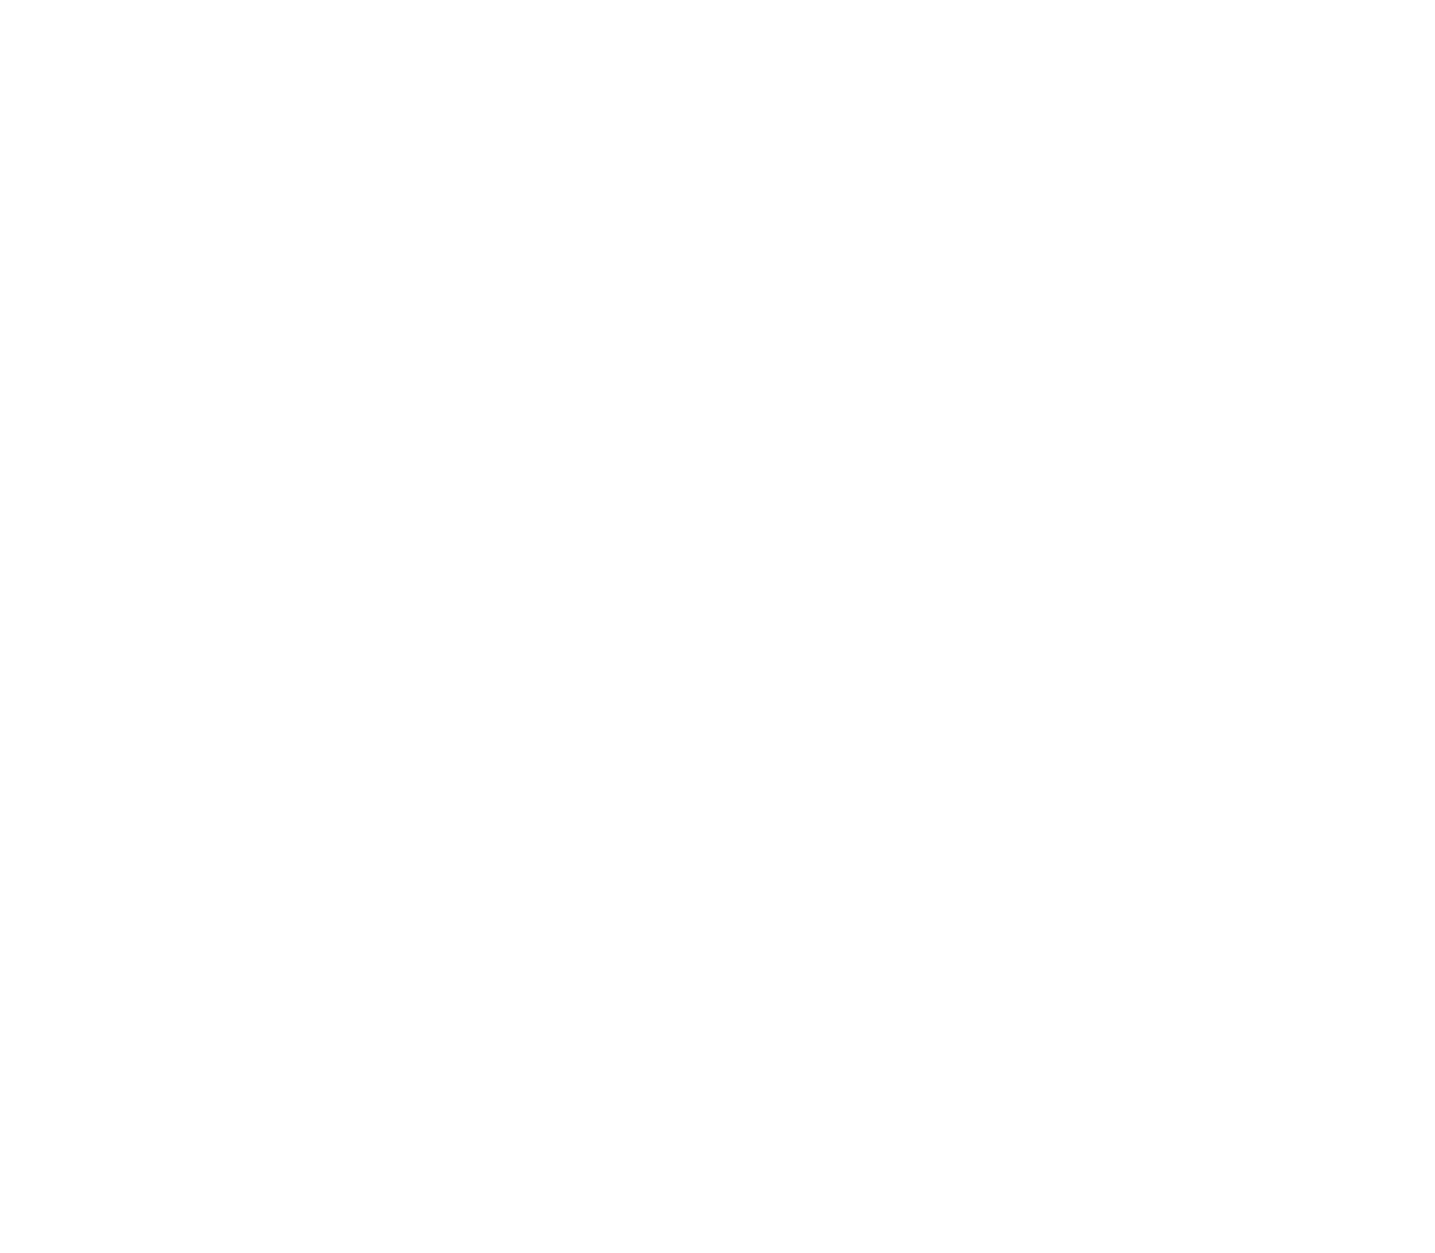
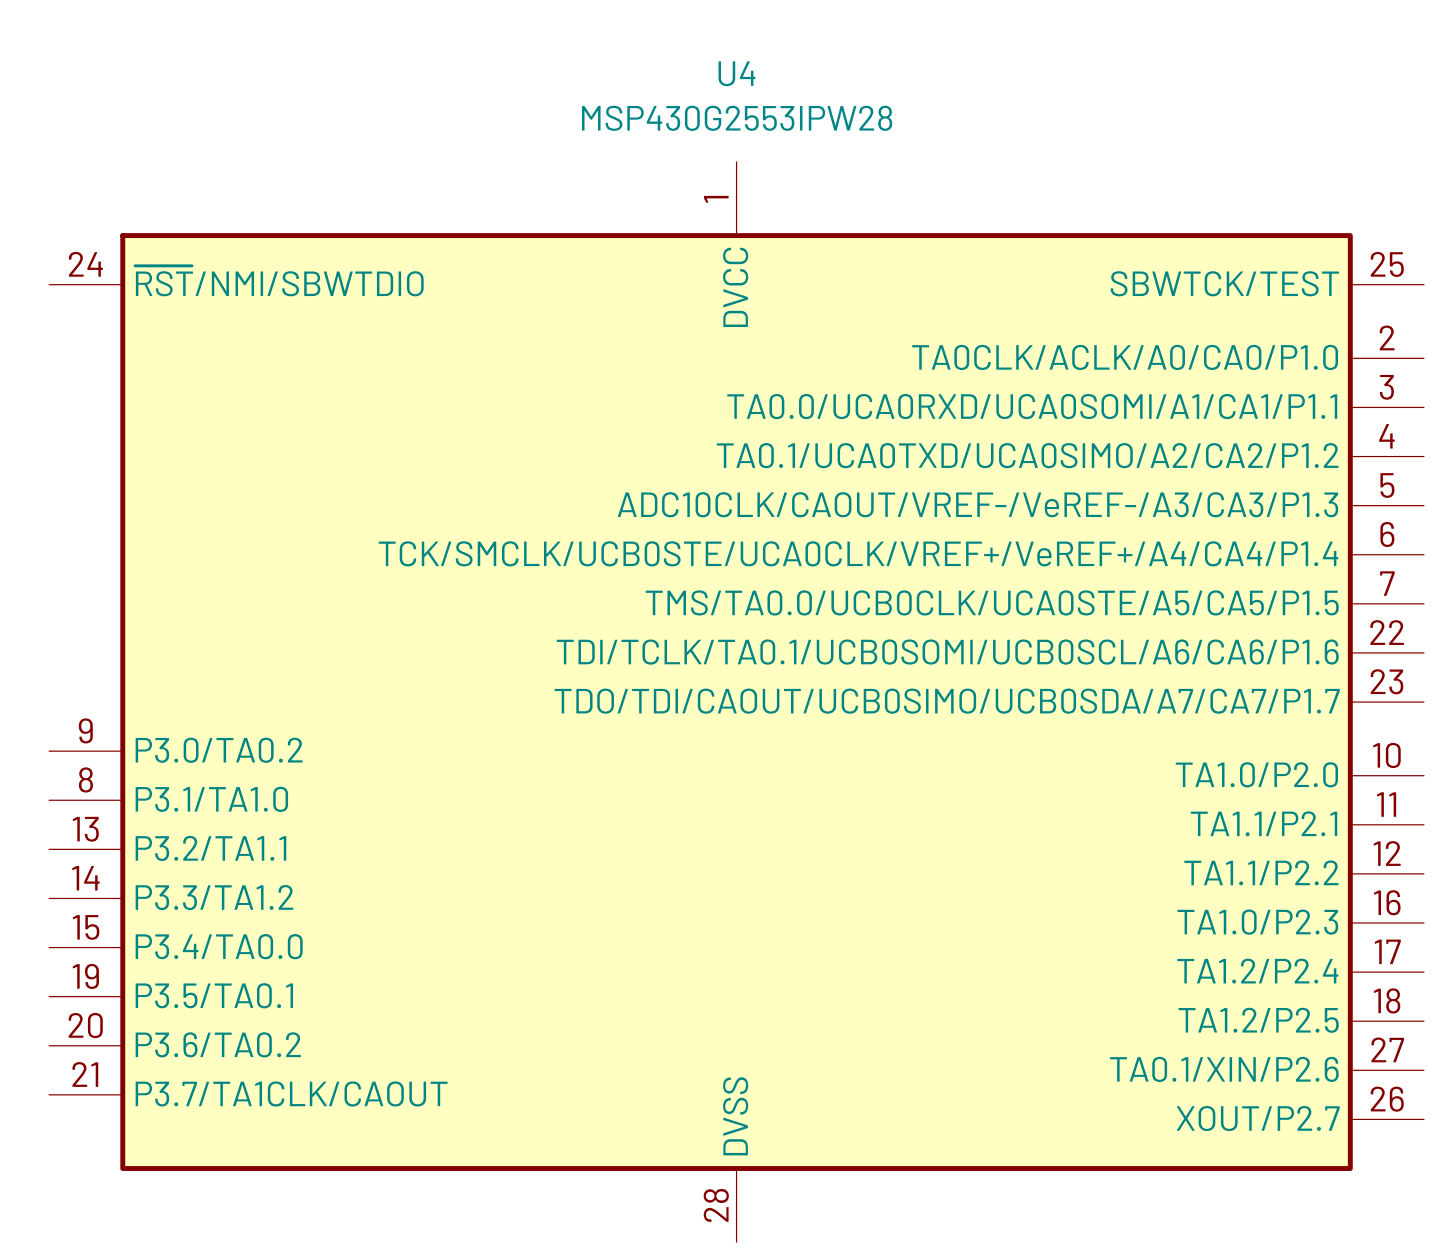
U4: none -> MSP430G2553IPW28 (736, 702)

